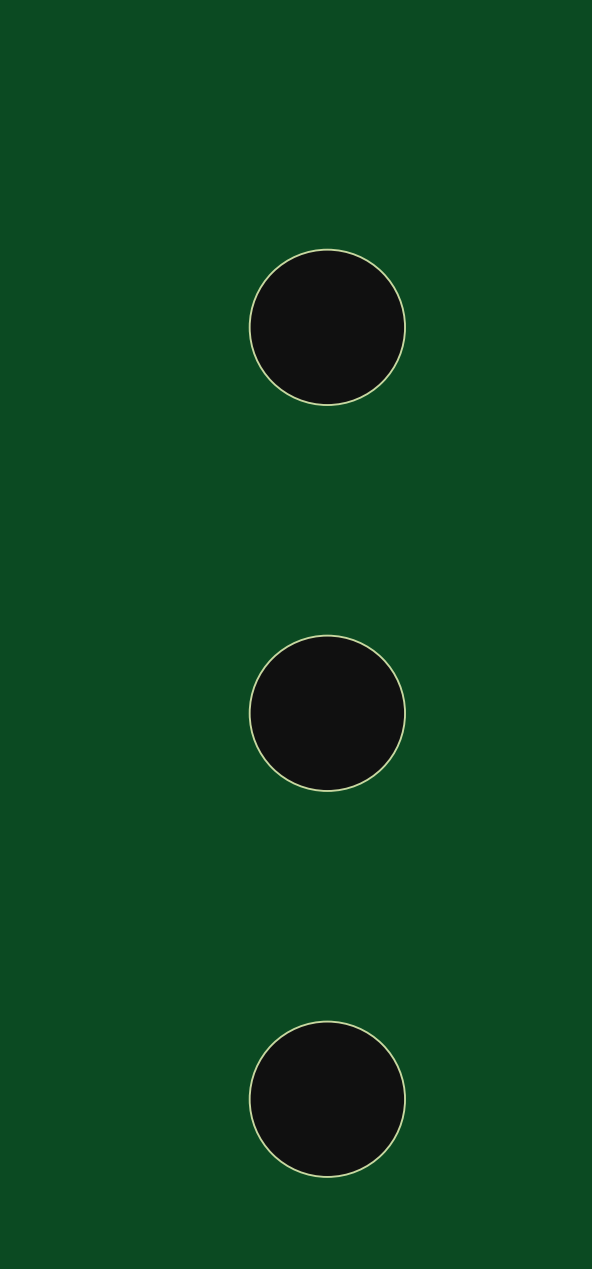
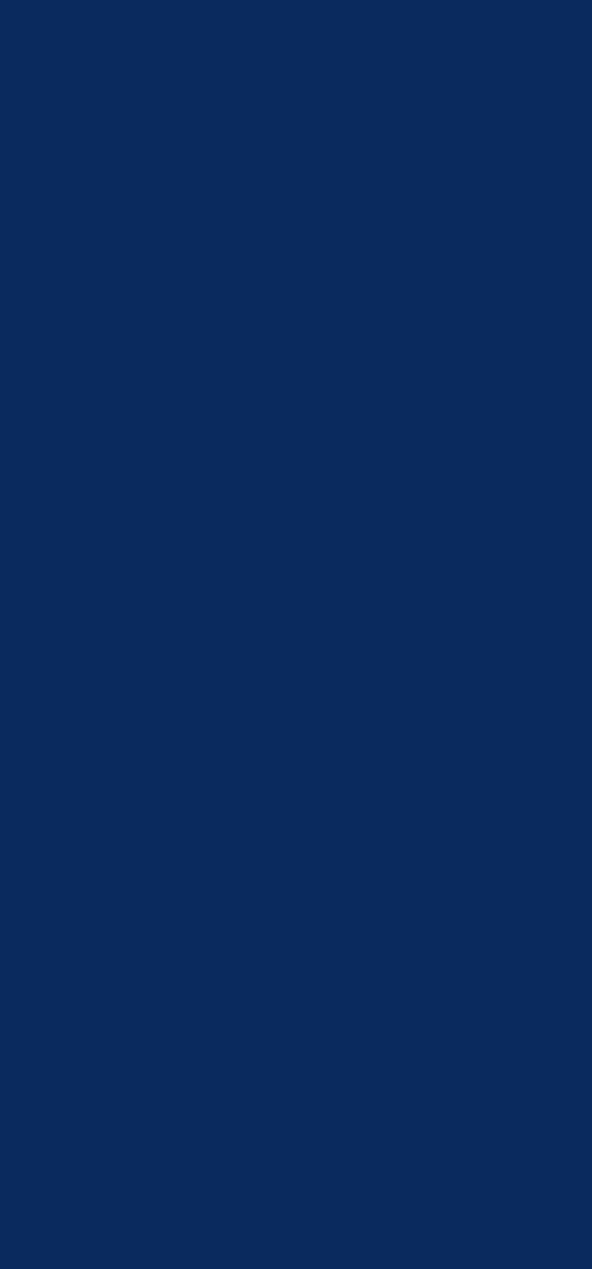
part: (327, 327) -> none
part: (327, 713) -> none
part: (327, 1099) -> none

